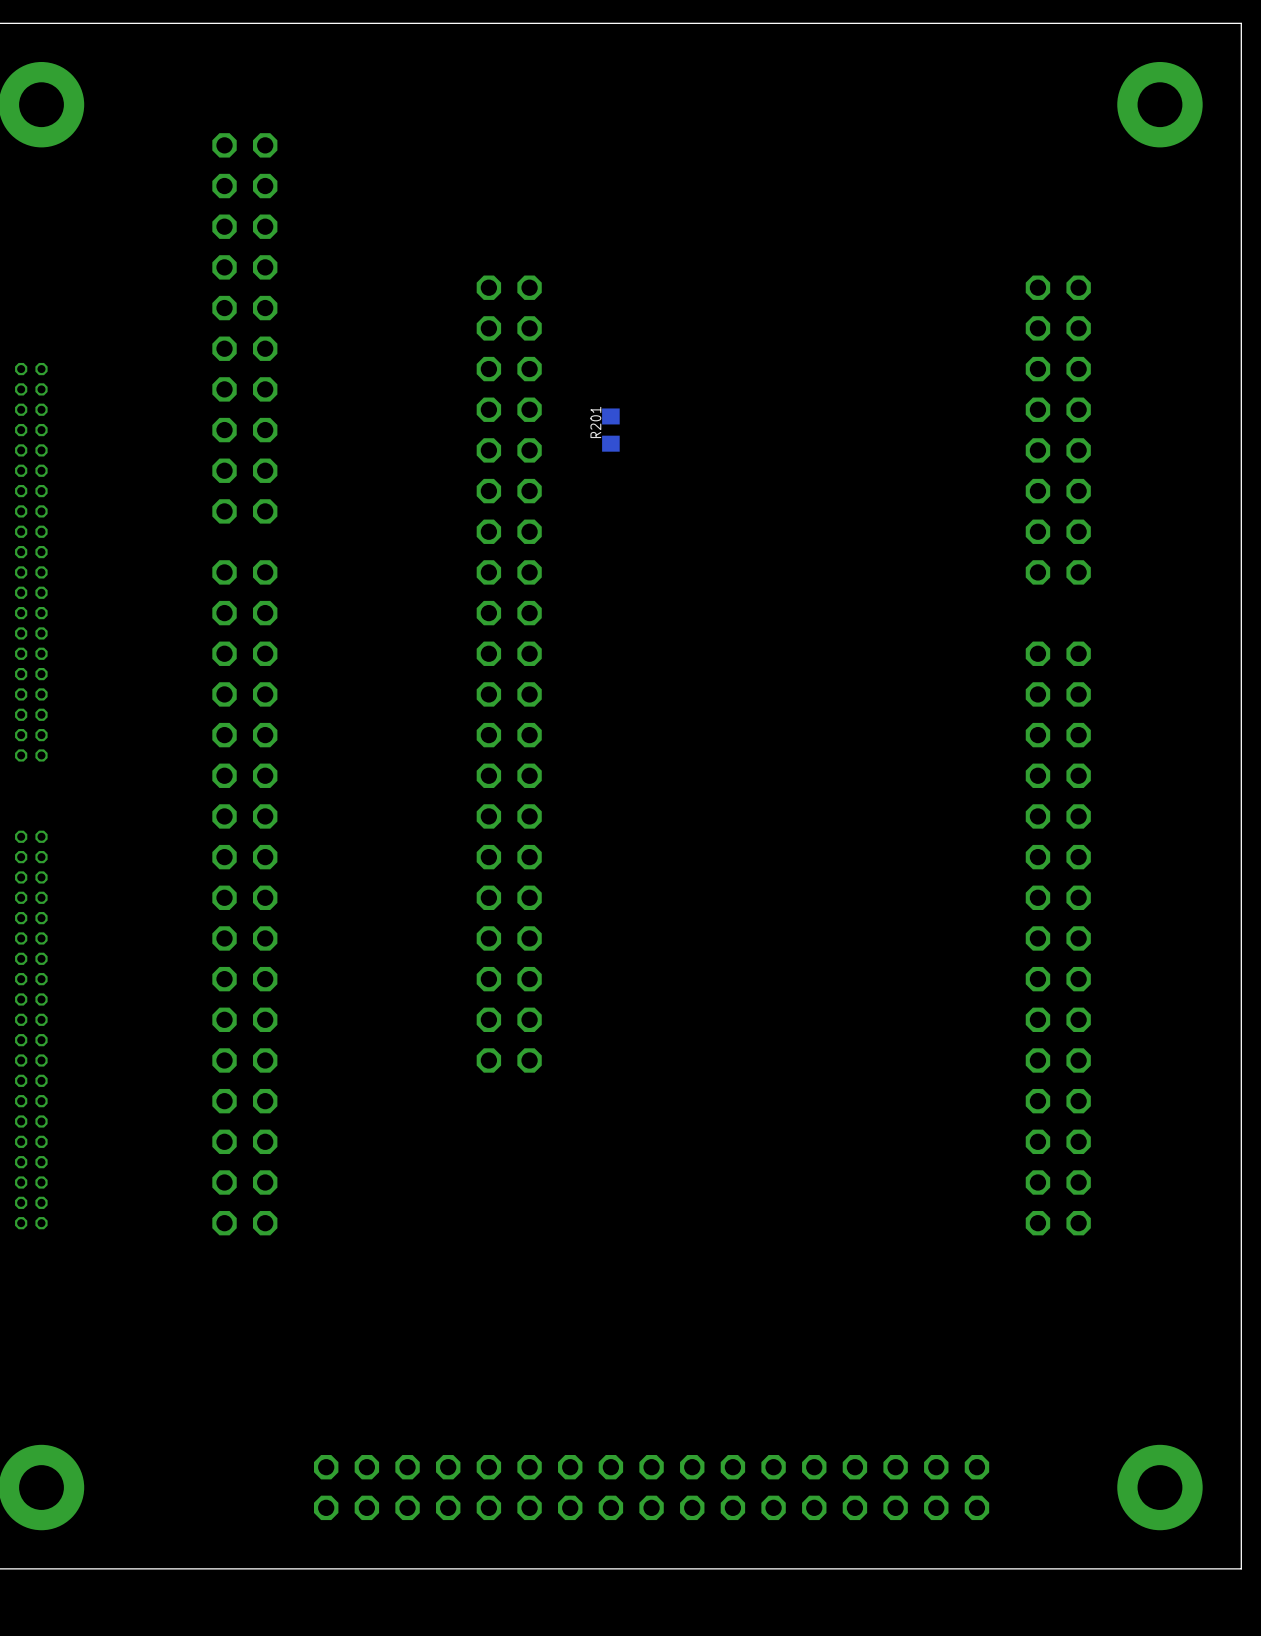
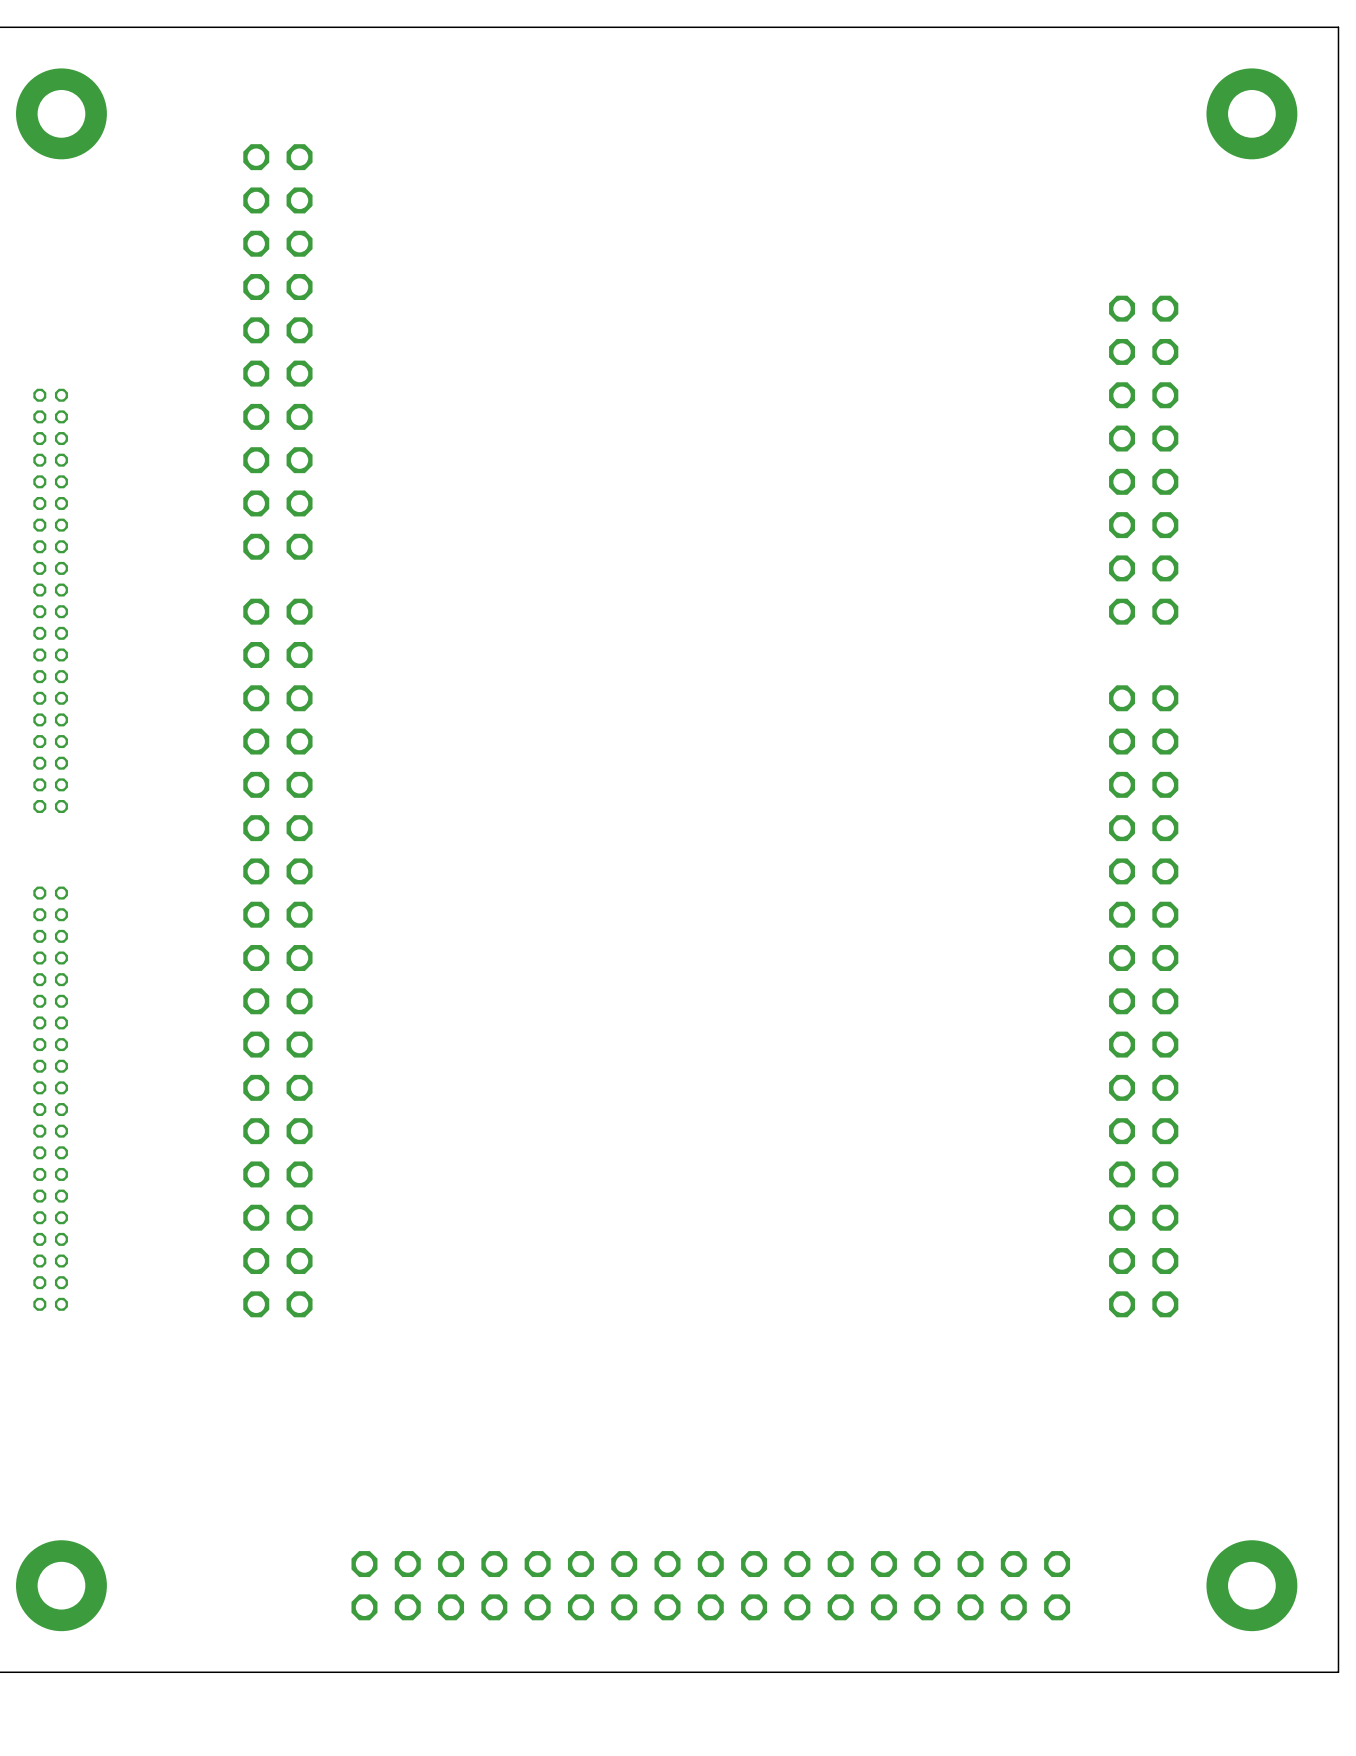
R201: (610, 430) -> none
part: (509, 674) -> none

